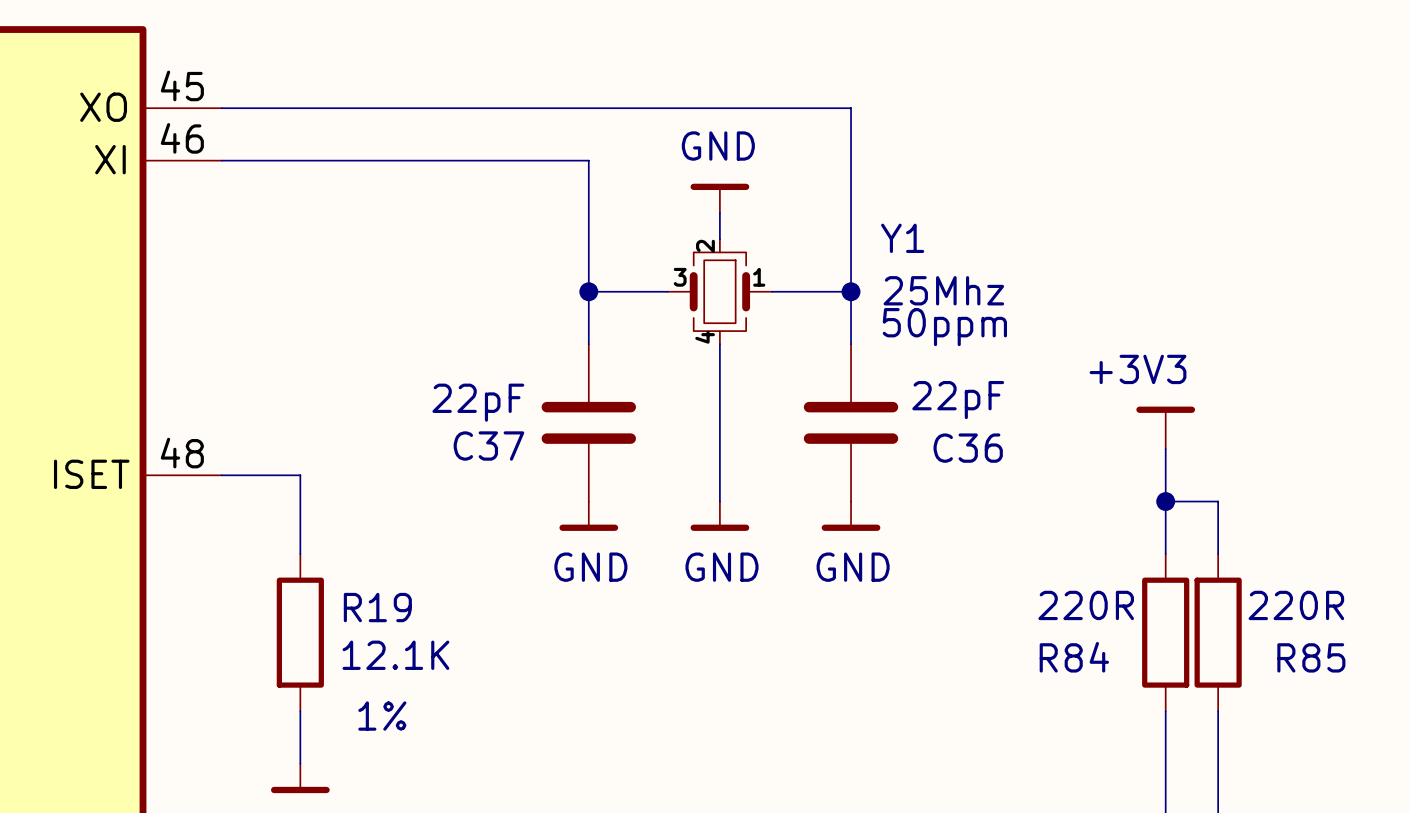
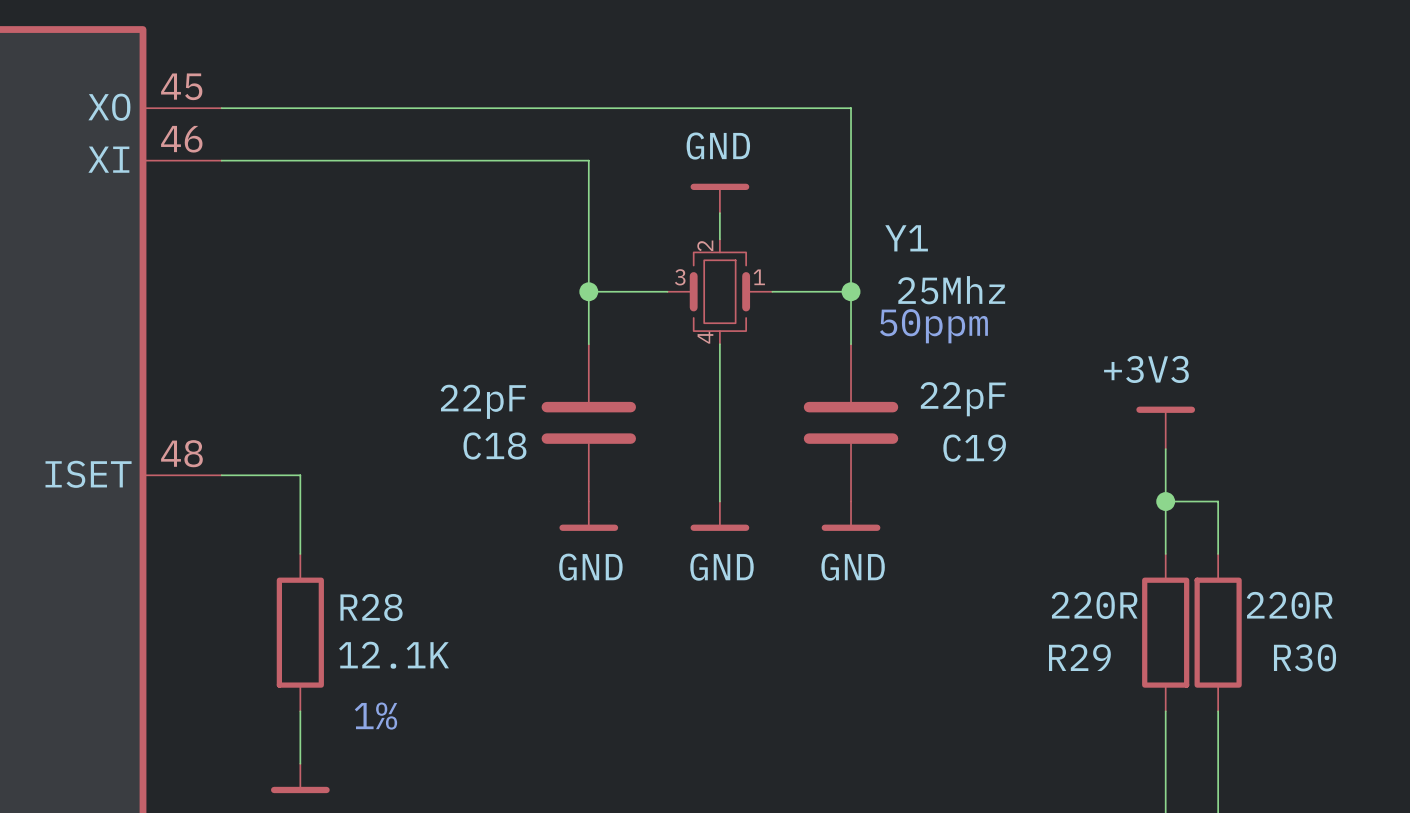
C37 name: C37 (488, 446) -> C18 (494, 446)
C36 name: C36 (968, 448) -> C19 (974, 448)
R19 name: R19 (377, 607) -> R28 (371, 607)
R84 name: R84 (1074, 657) -> R29 (1079, 657)
R85 name: R85 (1311, 657) -> R30 (1305, 657)

